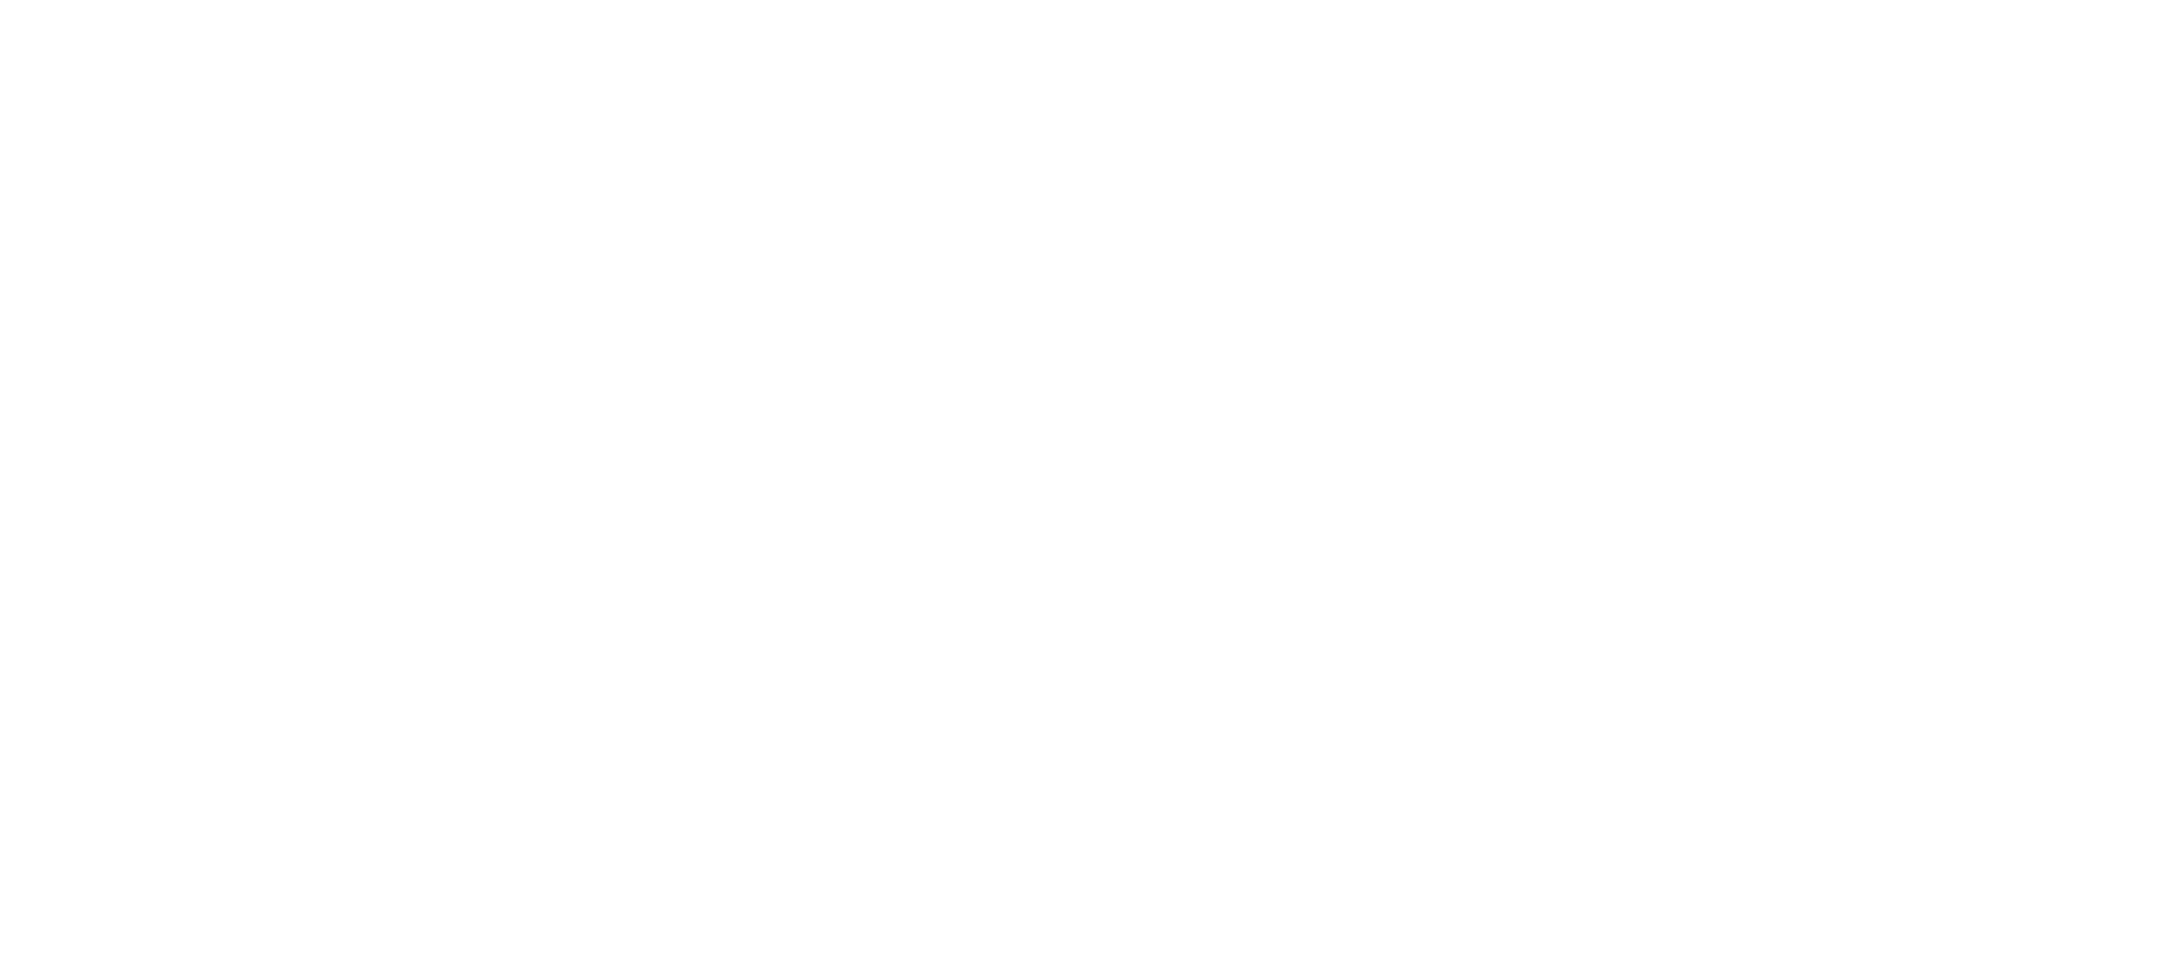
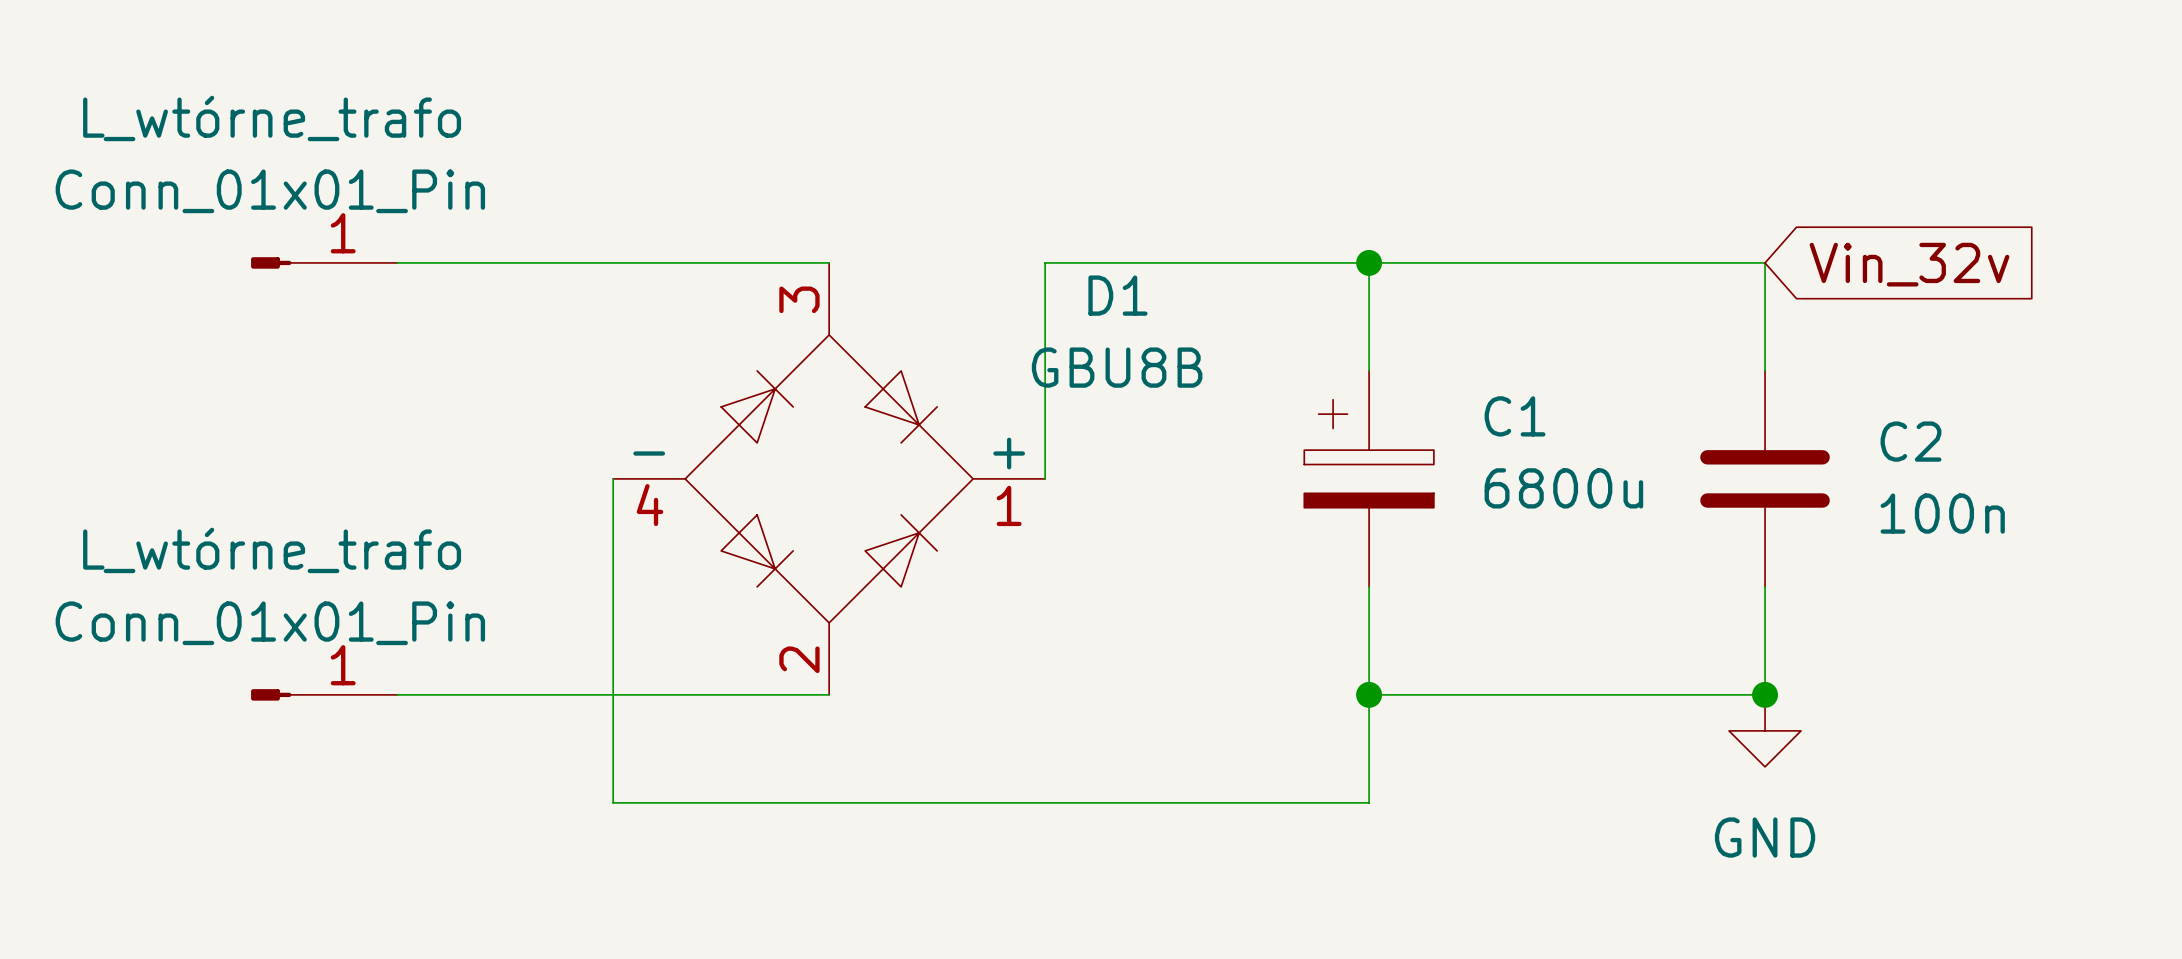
L_wtórne_trafo: none -> Conn_01x01_Pin (324, 262)
wire: none -> (397, 262) (829, 262)
wire: none -> (1369, 262) (1369, 370)
junction: none -> (1369, 262)
global label: none -> Vin_32v (1909, 264)
wire: none -> (1765, 370) (1765, 262) (1045, 262) (1045, 478)
wire: none -> (613, 478) (613, 802) (1369, 802) (1369, 586)
D1: none -> GBU8B (829, 478)
C1: none -> 6800u (1369, 478)
C2: none -> 100n (1765, 478)
wire: none -> (1765, 586) (1765, 694) (1369, 694)
L_wtórne_trafo: none -> Conn_01x01_Pin (324, 694)
wire: none -> (397, 694) (829, 694)
junction: none -> (1369, 694)
junction: none -> (1765, 694)
power symbol: none -> GND (1765, 730)

